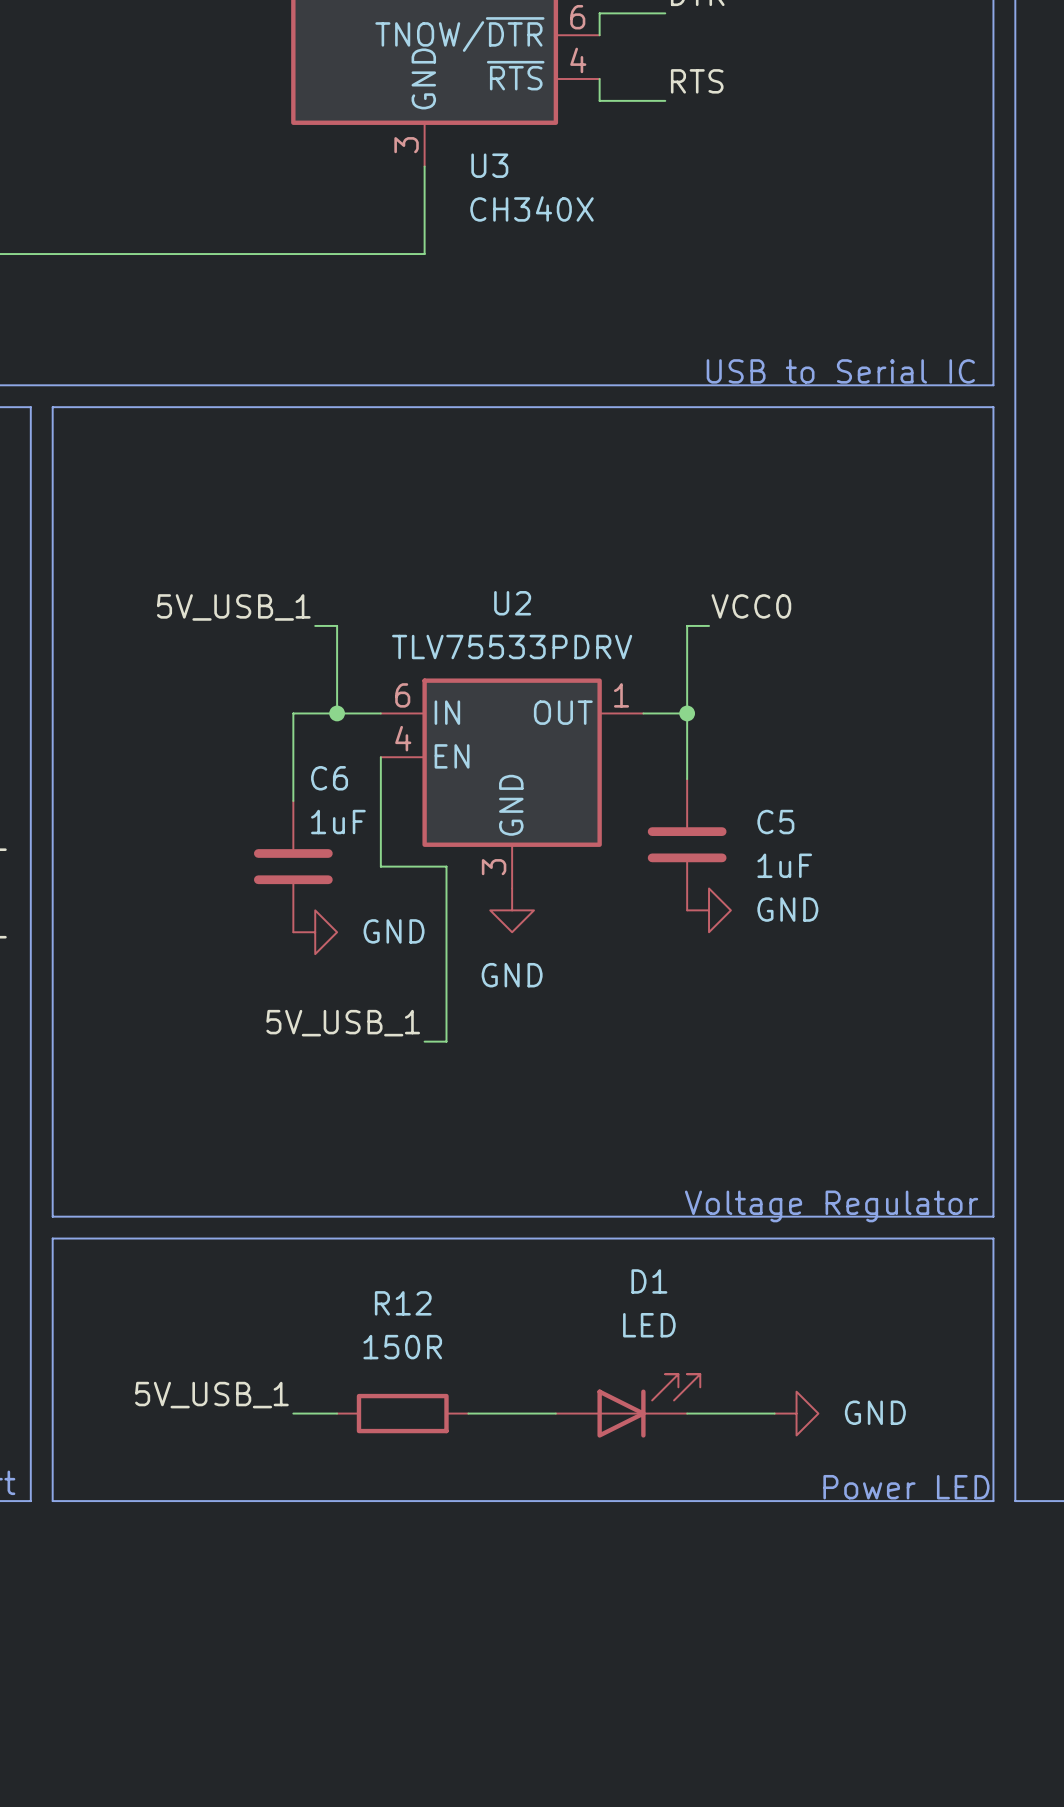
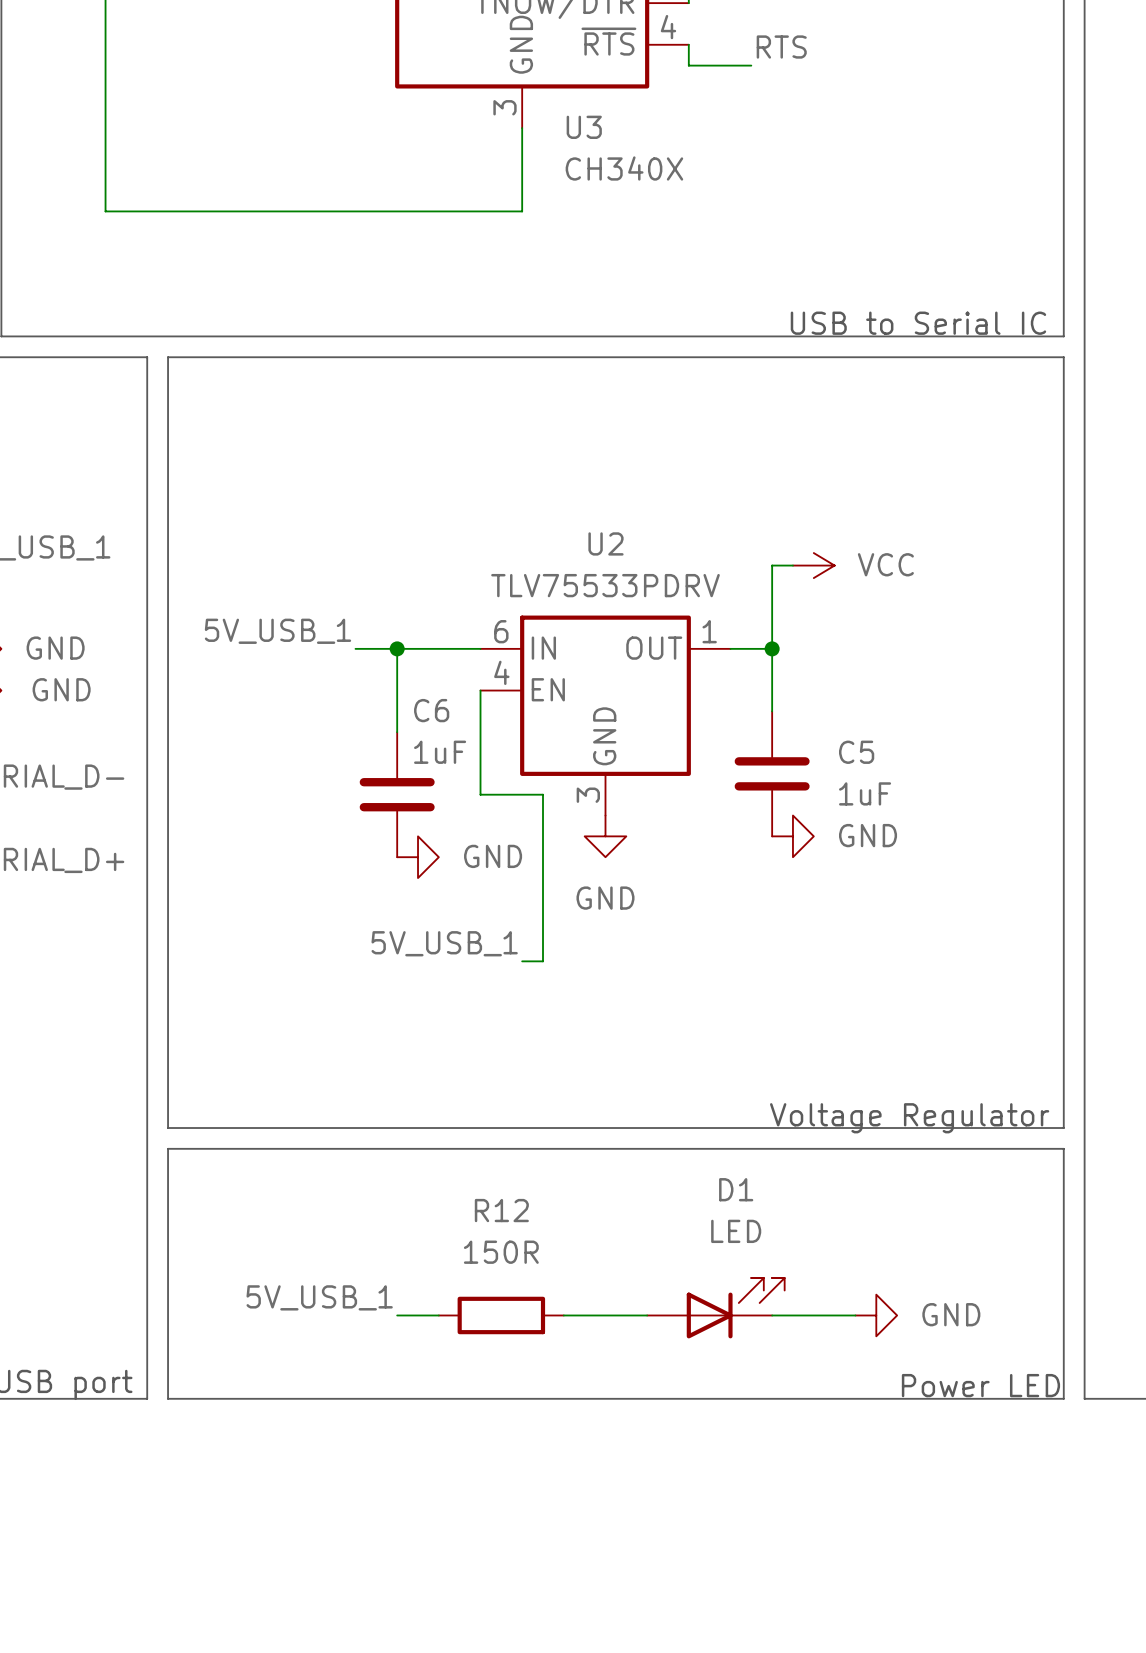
label: VCC0 (751, 606) -> none
label position: 5V_USB_1 (233, 607) -> 5V_USB_1 (277, 631)
wire: (315, 625) (337, 625) (337, 713) -> none
power symbol: none -> VCC (813, 565)
wire: none -> (355, 648) (397, 648)
junction position: (337, 713) -> (397, 648)

